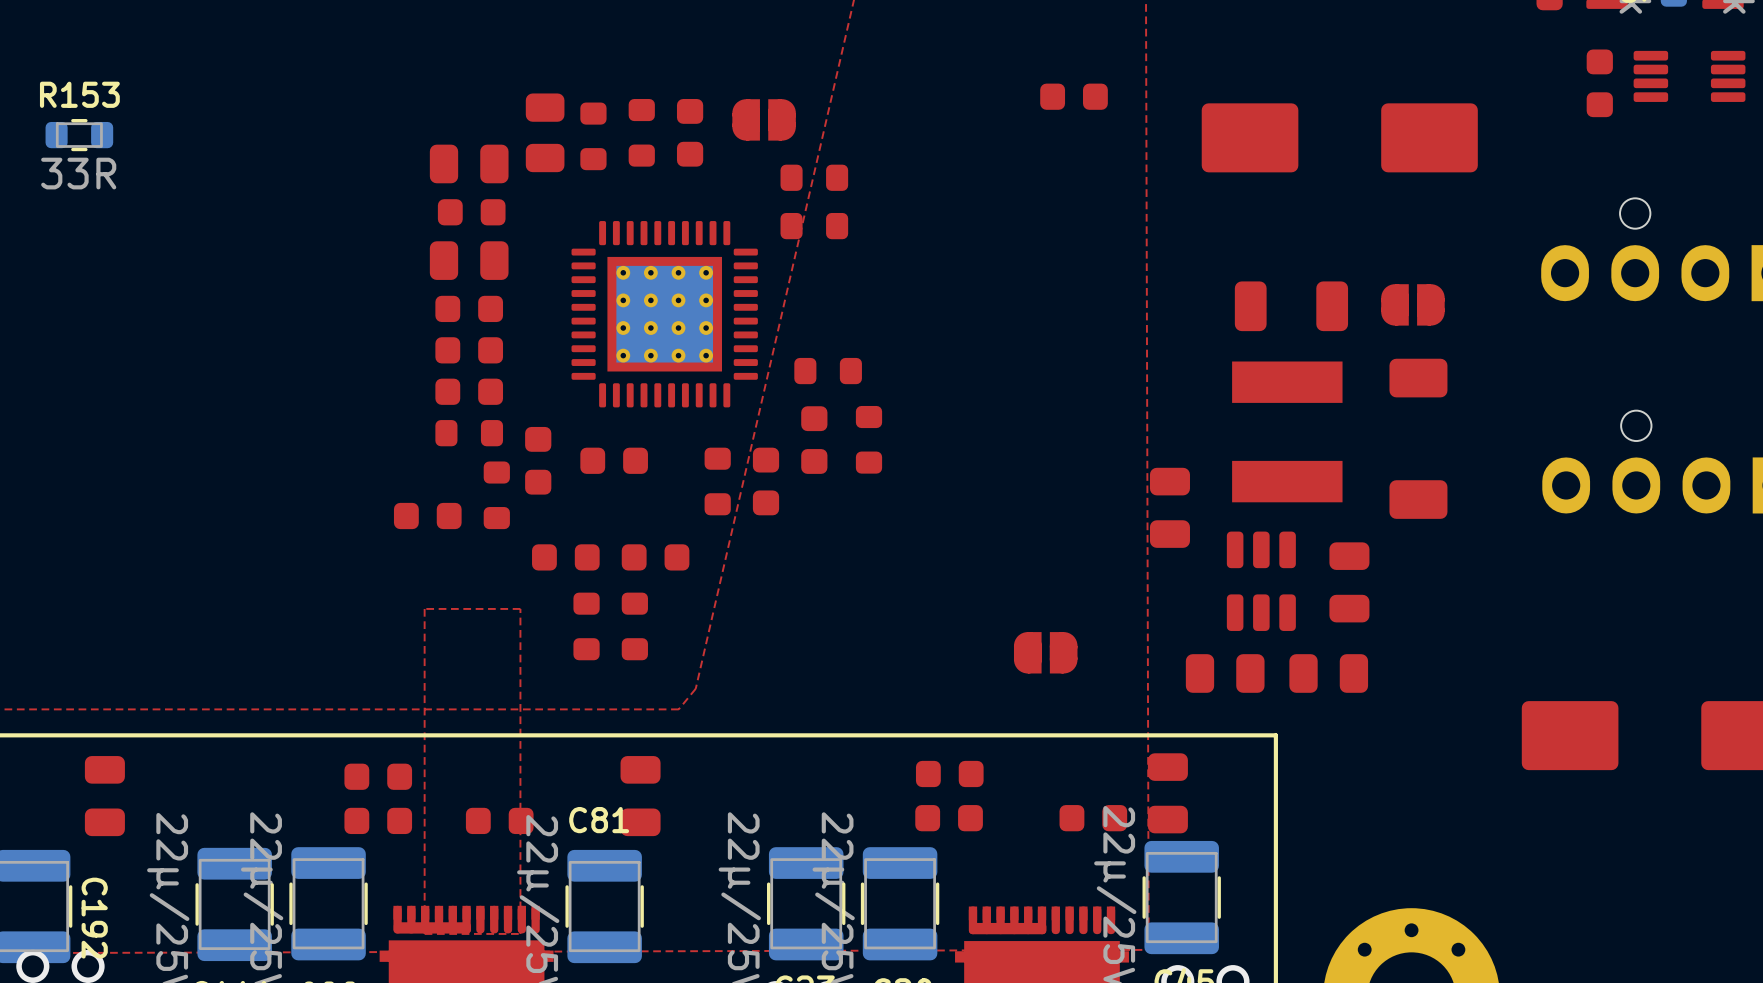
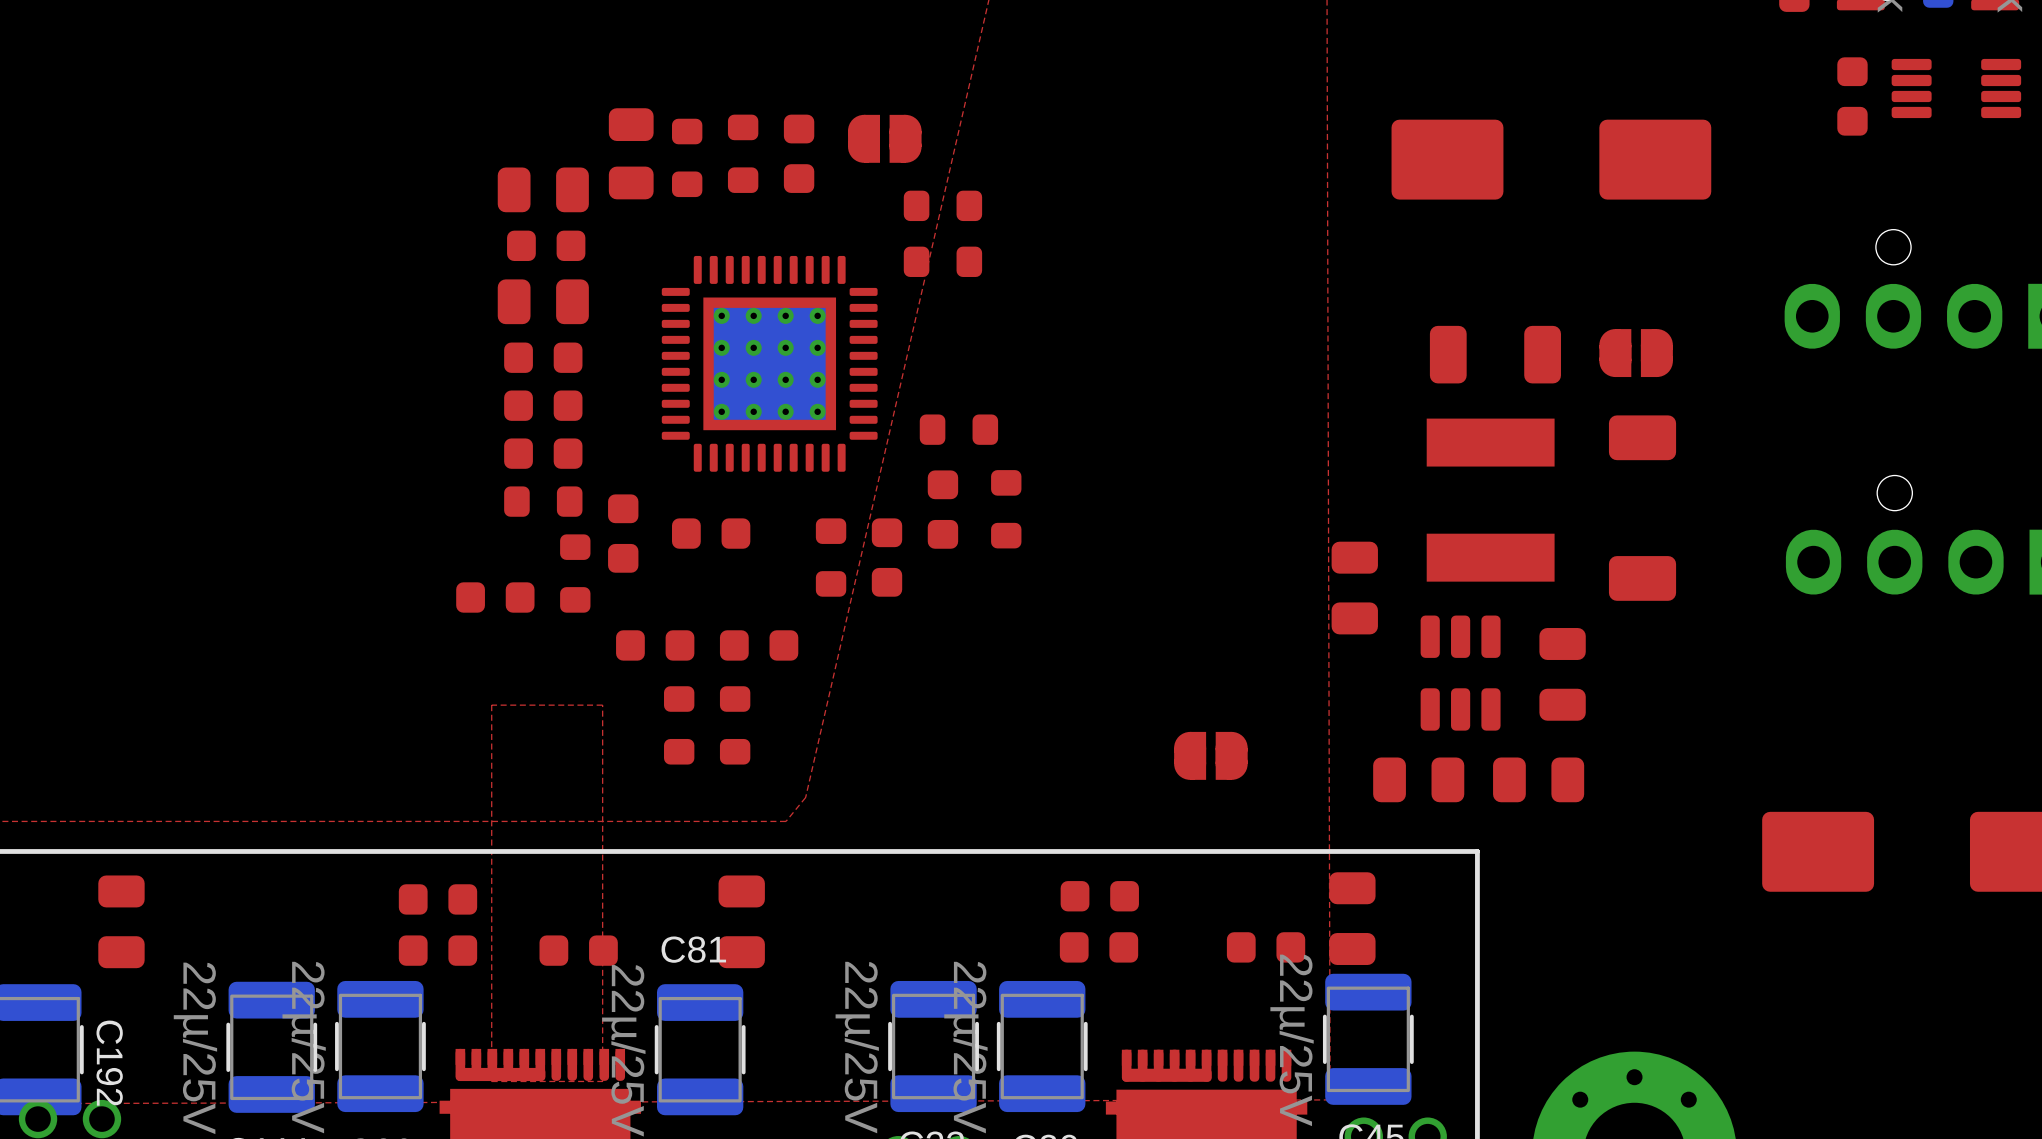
part: (1074, 96) -> none
R153: 33R (79, 135) -> none

